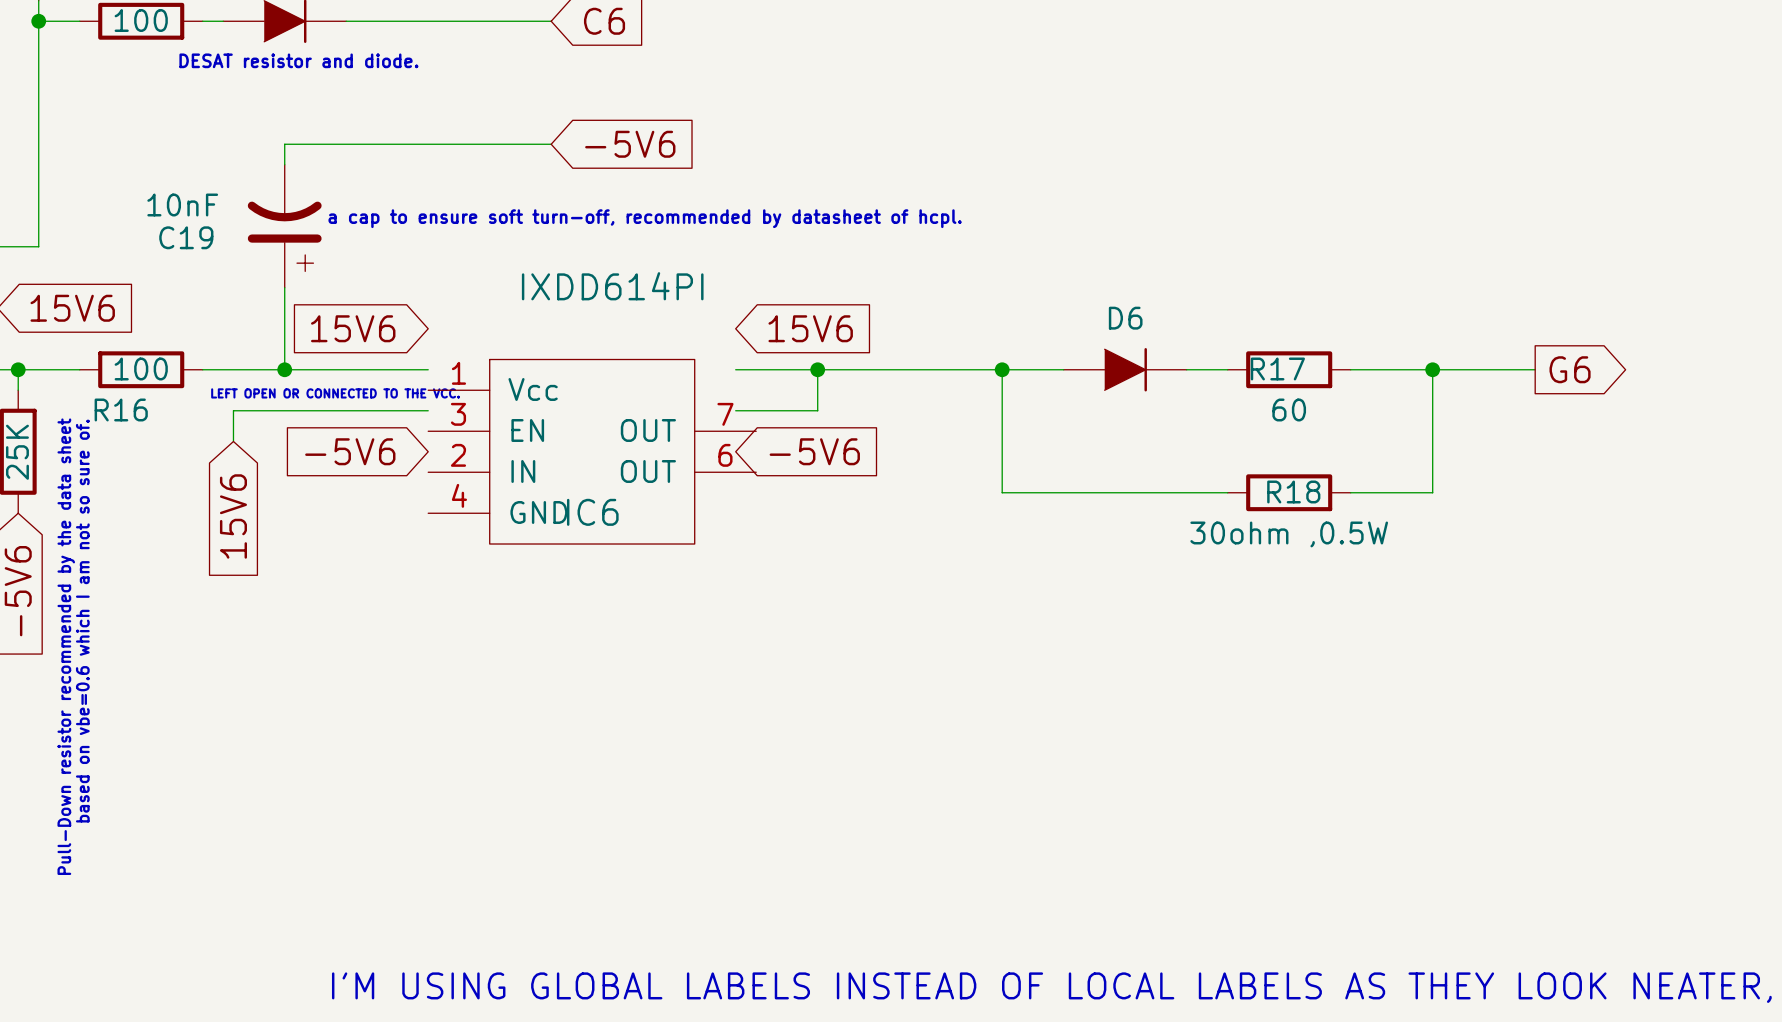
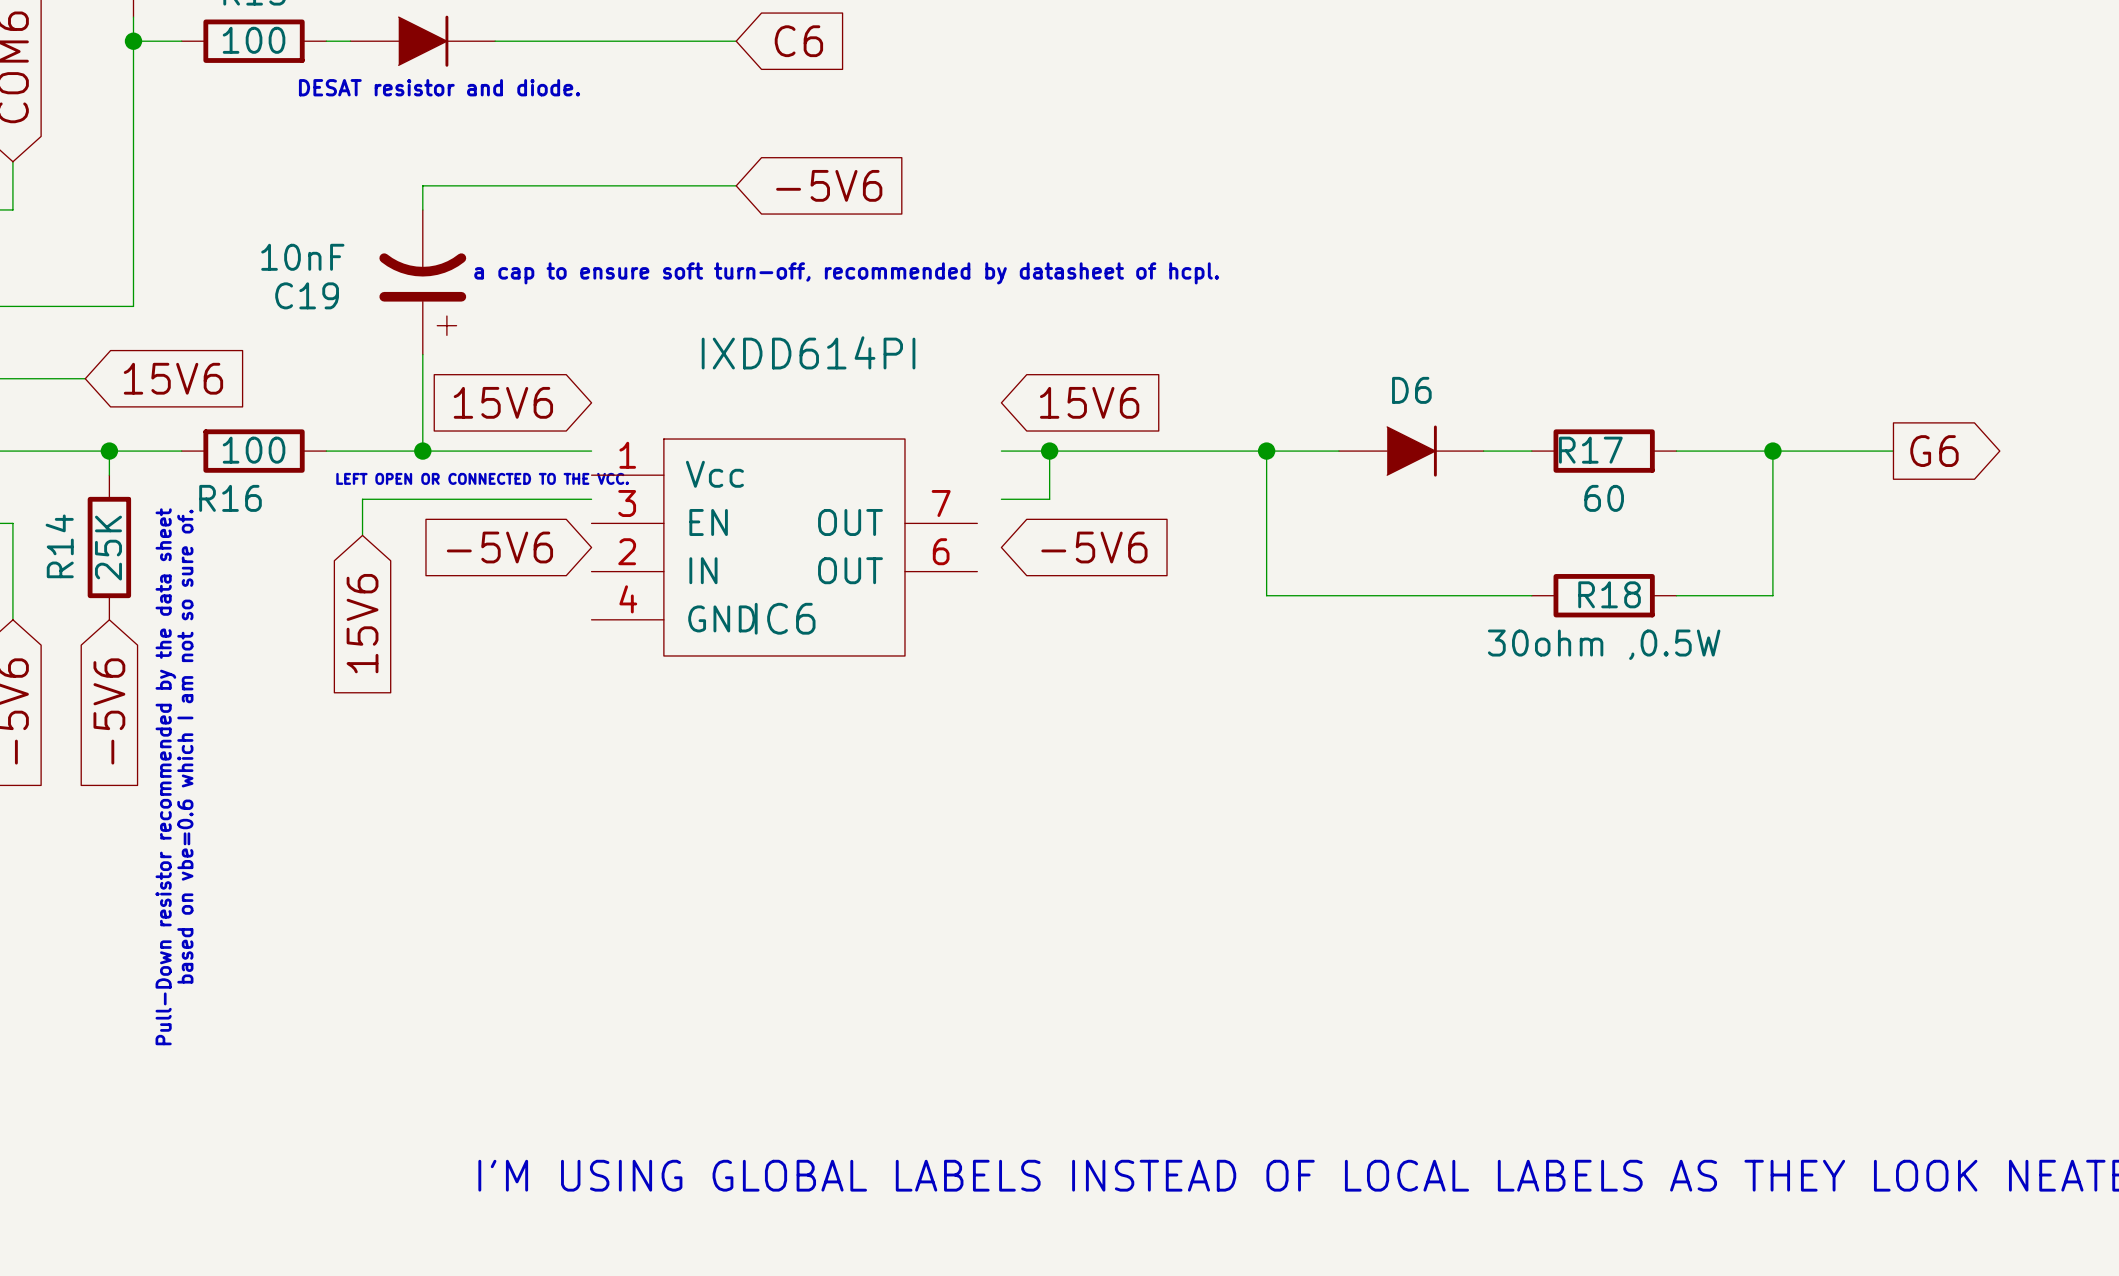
global label position: 15V6 (810, 328) -> 15V6 (1089, 402)
wire: (735, 369) (776, 369) -> none
wire: (735, 410) (776, 410) -> none
global label position: -5V6 (814, 451) -> -5V6 (1094, 547)

